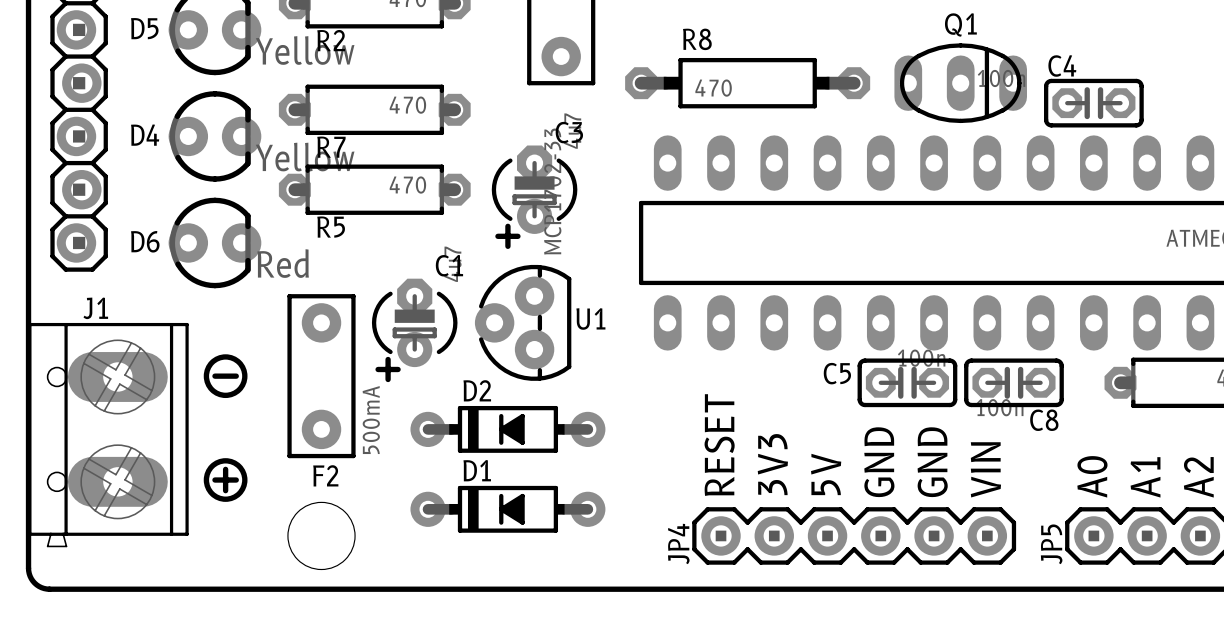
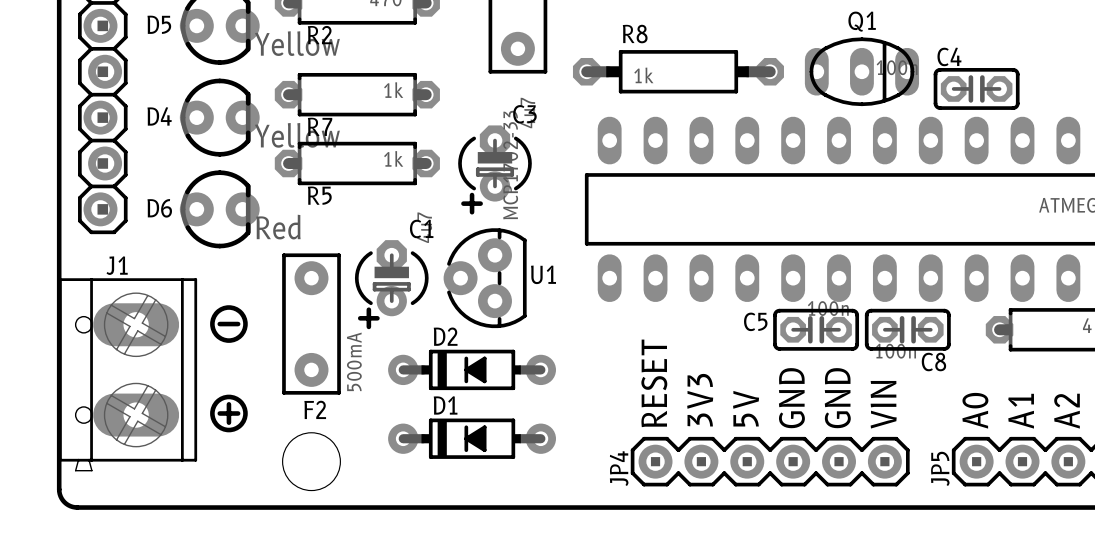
R8 value: 470 (713, 88) -> 1k (643, 75)
R7 value: 470 (407, 105) -> 1k (393, 90)
R5 value: 470 (407, 185) -> 1k (393, 158)

